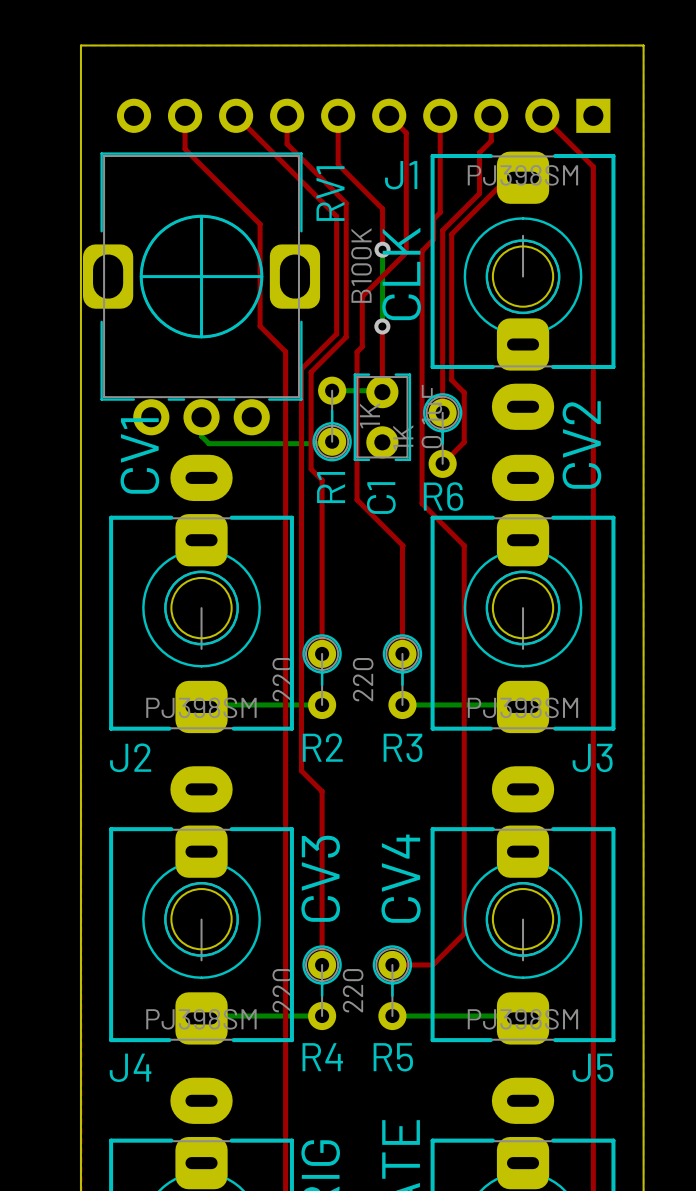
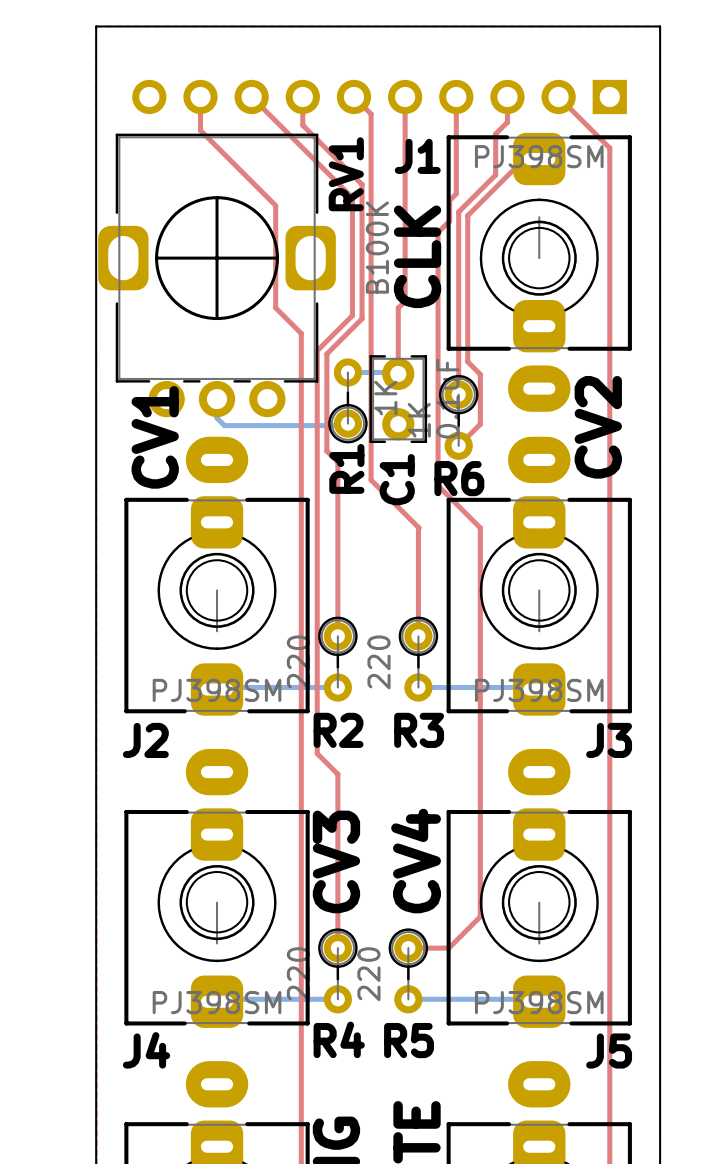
top track: (338, 115) (338, 164) (382, 208) (382, 249) -> none
top track: (389, 115) (406, 132) (406, 252) (362, 296) (362, 346) (357, 352) (357, 499) -> (353, 96) (371, 114) (371, 480) (372, 481)
top track: none -> (405, 96) (405, 301) (398, 308)
bottom track: (382, 249) (382, 326) -> none
via: (382, 249) -> none
via: (382, 326) -> none

